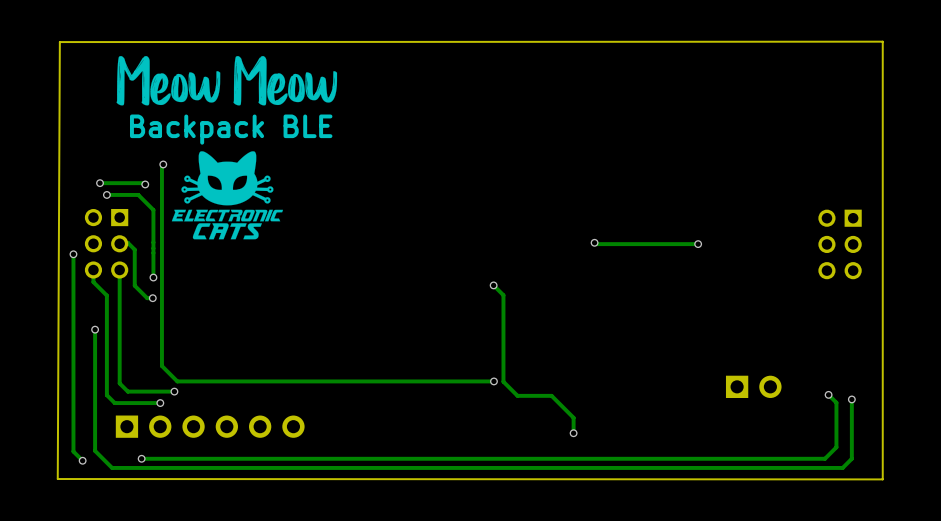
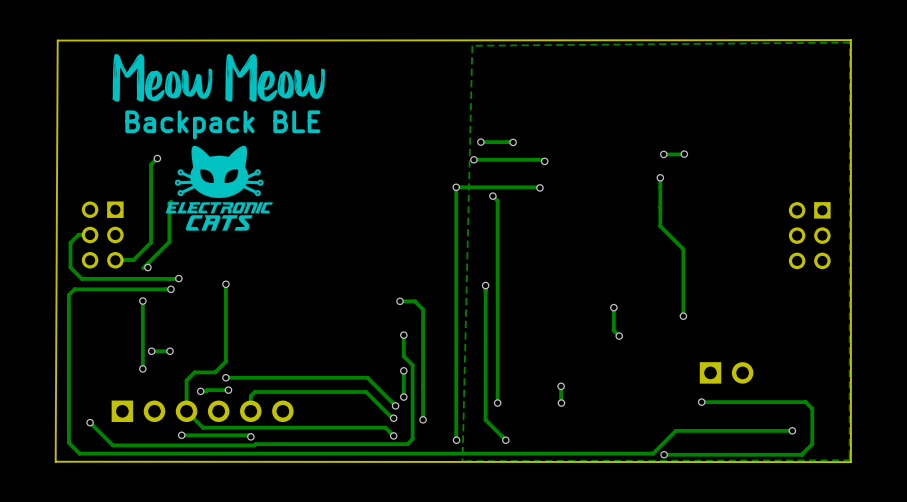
zone outline: none -> (849, 42) (472, 45) (462, 461) (850, 460) (849, 42)
track: none -> (480, 142) (513, 142)
via: none -> (480, 142)
via: none -> (513, 142)
track: none -> (684, 154) (663, 154)
via: none -> (684, 154)
via: none -> (663, 154)
track: (163, 164) (161, 366) (177, 381) (493, 381) -> none
track: none -> (473, 159) (543, 159) (544, 161)
via: none -> (473, 159)
via: none -> (544, 161)
track: (100, 183) (145, 184) -> none
via: (100, 183) -> none
via: (145, 184) -> none
track: none -> (660, 177) (660, 226) (683, 249) (683, 316)
via: none -> (660, 177)
track: (106, 194) (138, 194) (153, 210) (153, 277) -> none
via: (106, 194) -> none
via: none -> (456, 187)
track: none -> (539, 187) (456, 187) (456, 440)
via: none -> (539, 187)
track: none -> (492, 196) (497, 200) (497, 403)
via: none -> (492, 196)
track: none -> (171, 201) (169, 203) (169, 241) (143, 268)
track: (594, 242) (698, 244) -> none
via: (594, 242) -> none
track: none -> (90, 234) (78, 234) (70, 242) (70, 267) (81, 278) (178, 278)
track: (119, 243) (127, 242) (134, 249) (134, 285) (147, 298) (151, 297) -> none
via: (698, 244) -> none
track: (73, 254) (73, 451) (82, 460) -> none
via: (73, 254) -> none
track: (93, 270) (93, 282) (106, 295) (106, 395) (114, 403) (160, 403) -> none
track: (119, 270) (119, 383) (127, 391) (174, 391) -> (115, 259) (133, 259) (151, 242) (151, 164) (156, 159)
track: (493, 285) (503, 295) (503, 381) (517, 395) (551, 395) (573, 417) (573, 433) -> none
via position: (493, 285) -> (485, 285)
via: none -> (178, 278)
track: none -> (225, 284) (225, 361) (215, 372) (194, 372) (186, 380) (186, 411) (203, 427) (385, 427) (393, 435)
via: none -> (225, 284)
track: none -> (485, 285) (485, 420) (505, 440)
via: (152, 298) -> none
track: none -> (170, 289) (74, 289) (68, 295) (68, 442) (79, 453) (653, 453) (675, 430) (792, 430)
via: none -> (170, 289)
track: none -> (142, 301) (142, 368)
via: none -> (142, 301)
track: none -> (400, 301) (414, 301) (423, 309) (423, 419)
via: none -> (400, 301)
track: none -> (613, 307) (613, 330) (619, 336)
via: none -> (613, 307)
via: none -> (683, 316)
track: (95, 329) (95, 450) (112, 467) (842, 467) (851, 458) (851, 399) -> none
via: (95, 329) -> none
track: none -> (403, 335) (403, 356) (412, 365) (412, 439) (407, 444) (112, 445) (90, 422)
via: none -> (403, 335)
via: none -> (619, 336)
via: none -> (151, 351)
track: none -> (170, 351) (151, 351)
via: none -> (170, 351)
via: (493, 381) -> none
via: none -> (142, 368)
track: none -> (403, 370) (403, 397)
via: none -> (403, 370)
via: (174, 391) -> none
track: none -> (225, 377) (367, 377) (395, 405)
via: none -> (225, 377)
track: (828, 394) (836, 402) (836, 447) (824, 458) (141, 458) -> none
via: (828, 394) -> none
via: (851, 399) -> none
track: none -> (561, 386) (561, 403)
via: none -> (561, 386)
via: (160, 403) -> none
track: none -> (228, 390) (200, 391)
via: none -> (228, 390)
via: none -> (200, 391)
via: none -> (403, 397)
track: none -> (701, 402) (805, 402) (812, 408) (812, 444) (802, 454) (664, 454)
via: none -> (701, 402)
via: none -> (497, 403)
via: none -> (561, 403)
via: none -> (395, 405)
track: none -> (250, 411) (250, 396) (254, 392) (366, 392) (393, 418)
via: none -> (393, 418)
via: (573, 433) -> none
via: none -> (423, 419)
via: none -> (792, 430)
track: none -> (181, 435) (249, 435) (250, 436)
via: none -> (181, 435)
via: none -> (393, 435)
via: none -> (250, 436)
via: none -> (456, 440)
via: none -> (505, 440)
via: (141, 458) -> none
via position: (82, 460) -> (90, 422)
via: none -> (664, 454)

